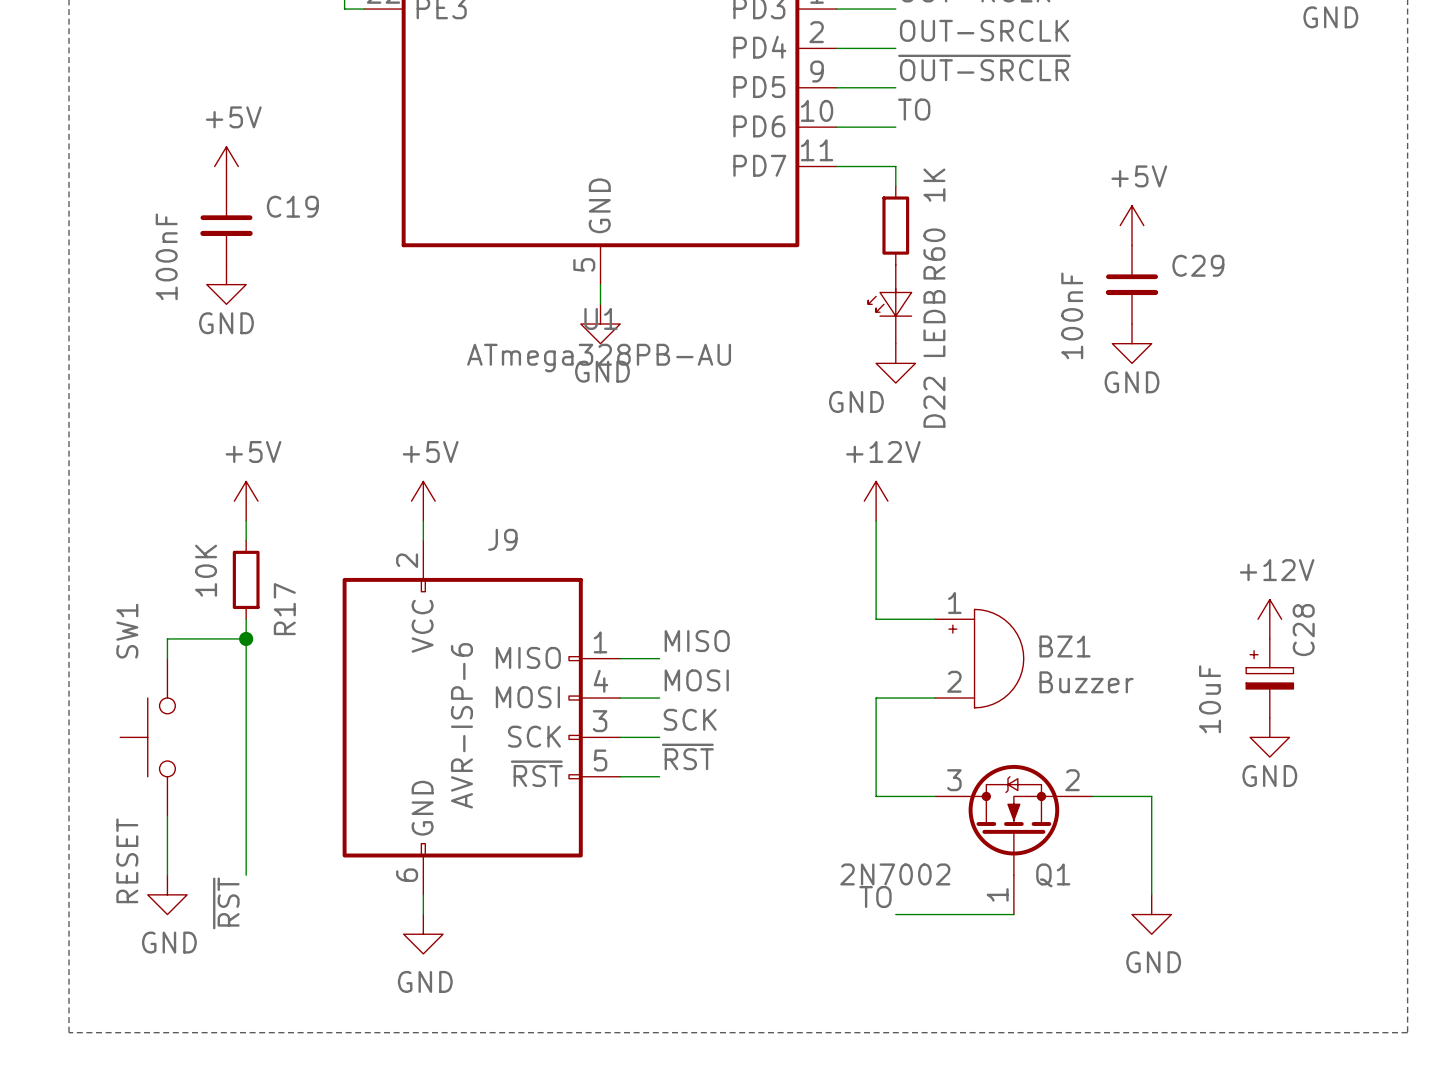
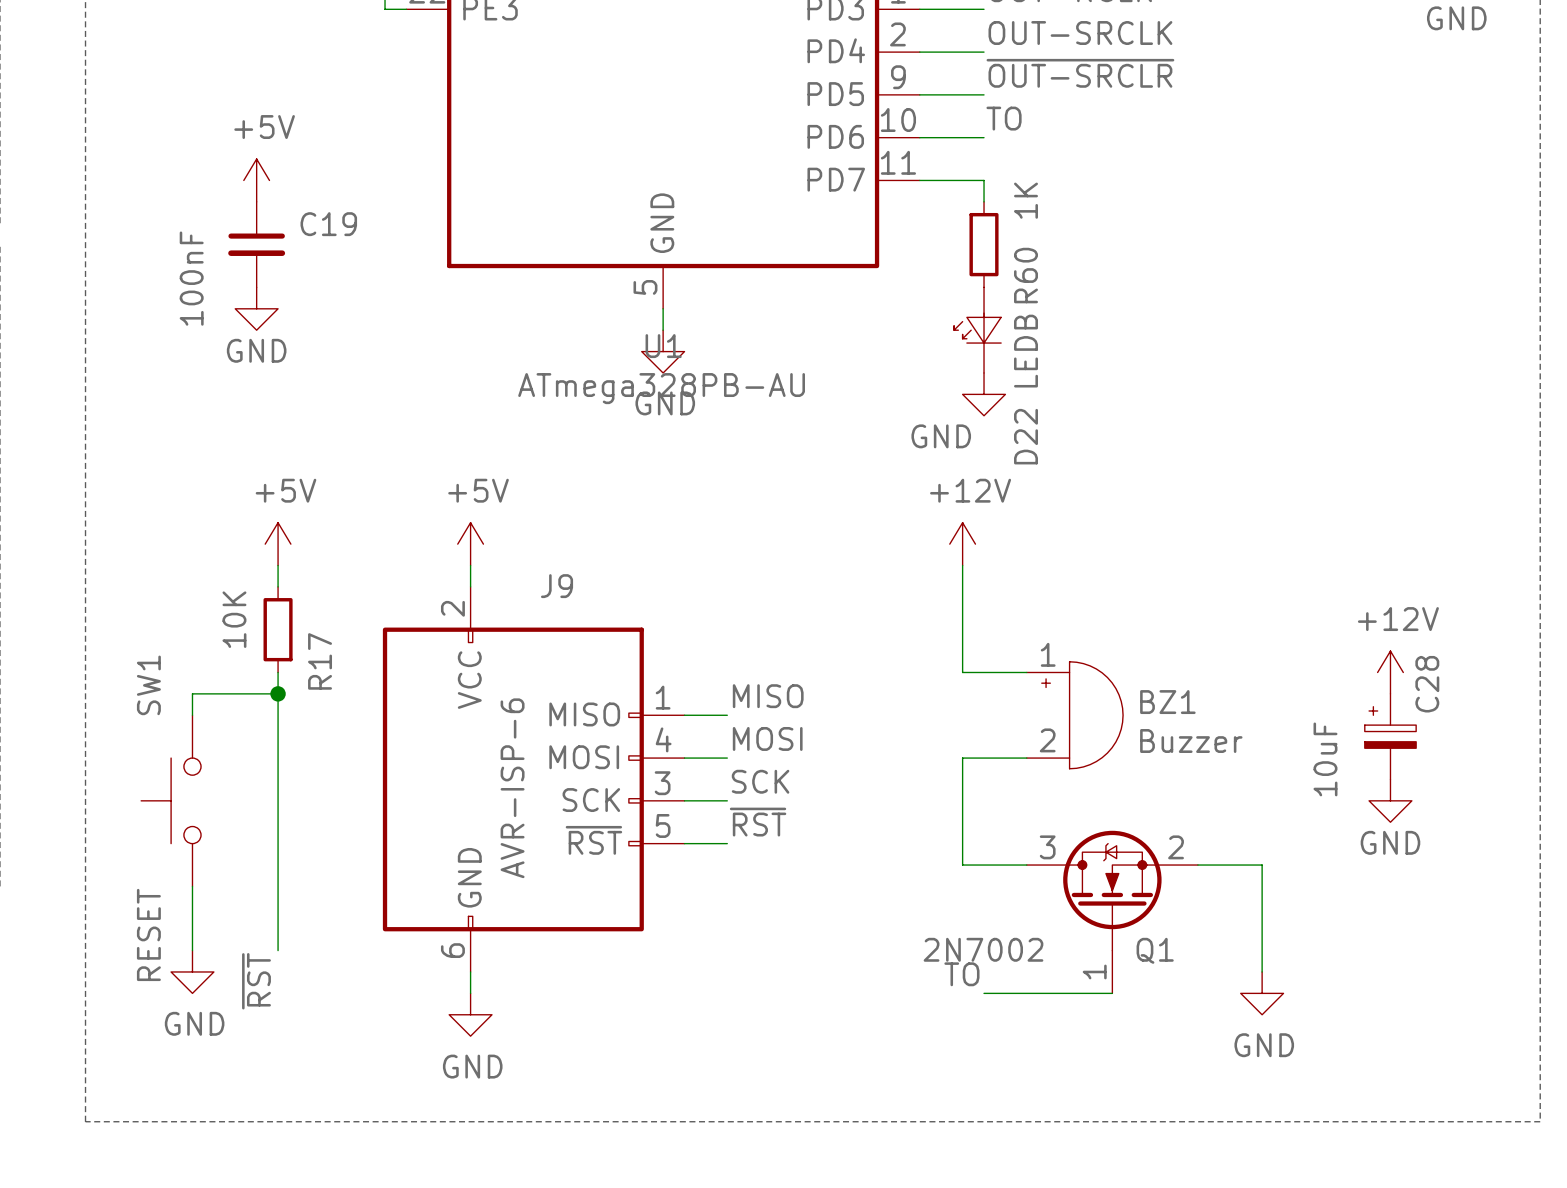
power symbol: +5V (1132, 225) -> none
C29: 100nF (1132, 284) -> none
power symbol: GND (1132, 343) -> none

